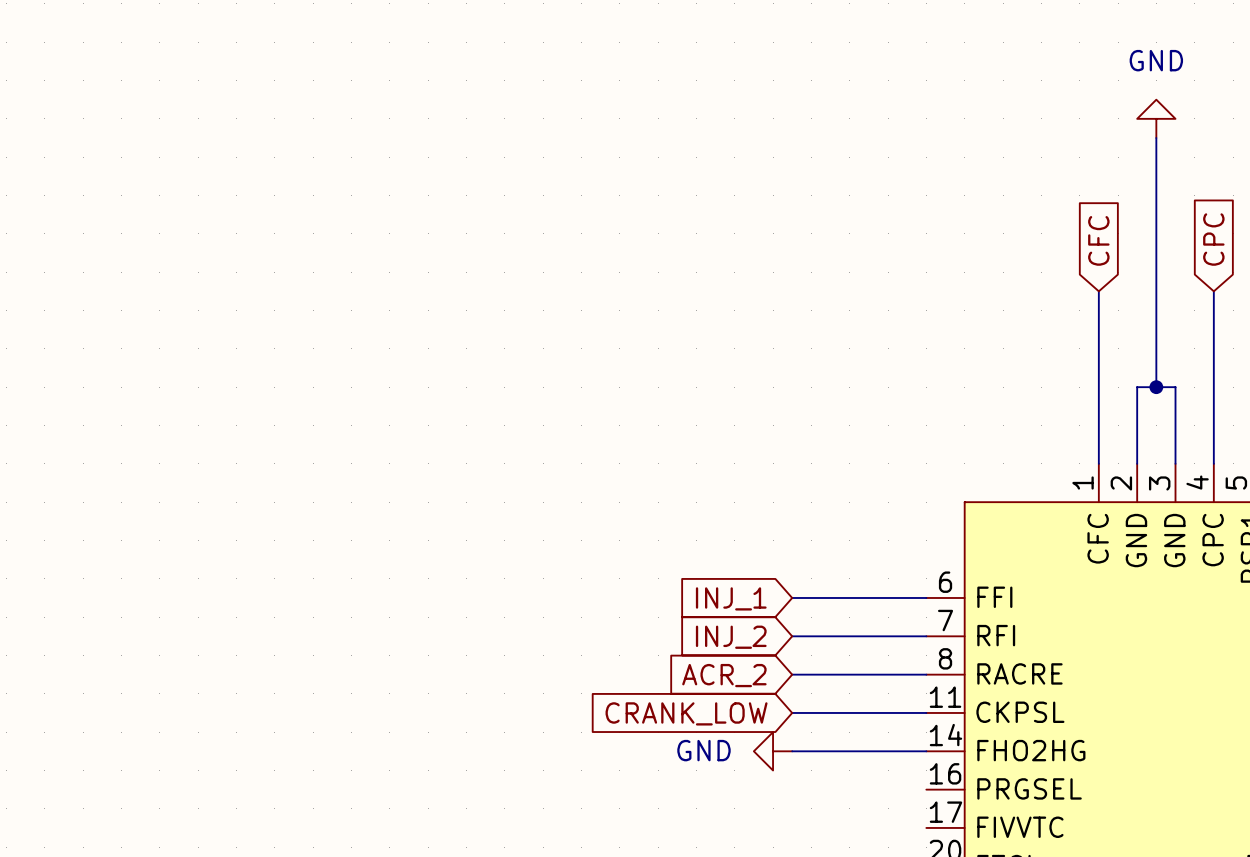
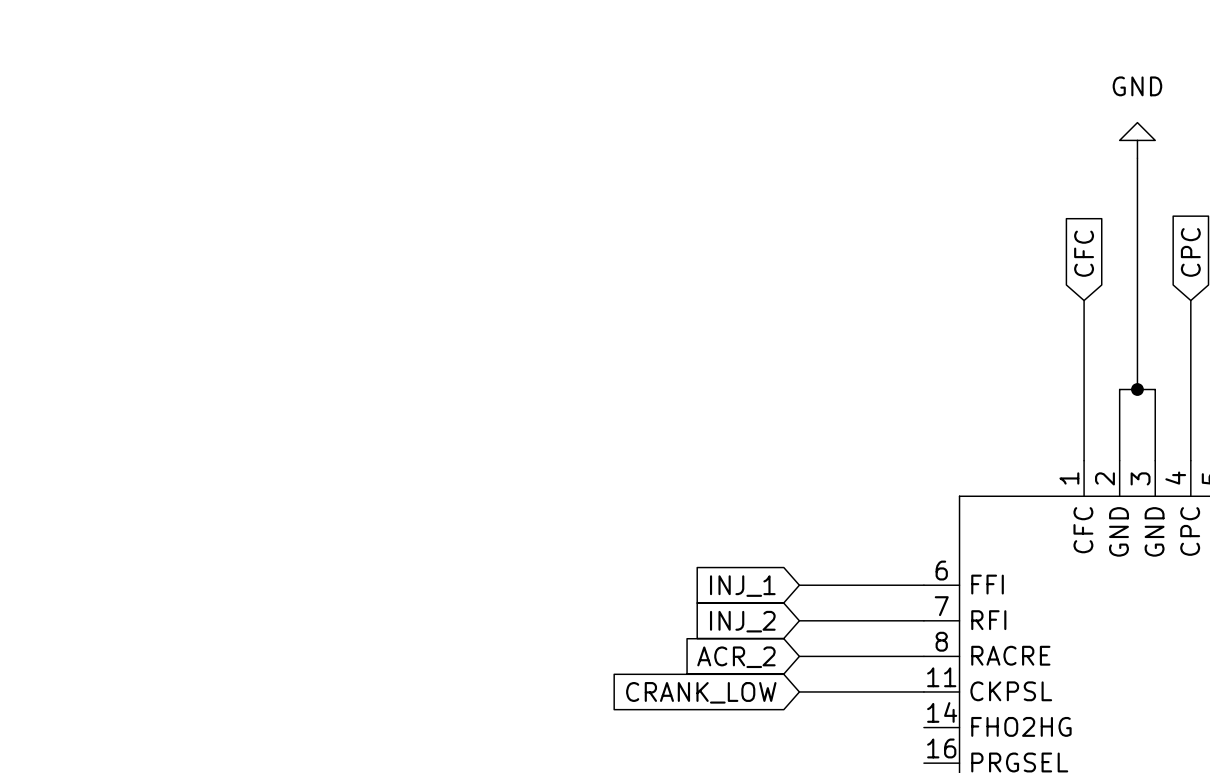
power symbol: GND (773, 751) -> none
wire: (792, 751) (926, 751) -> none

